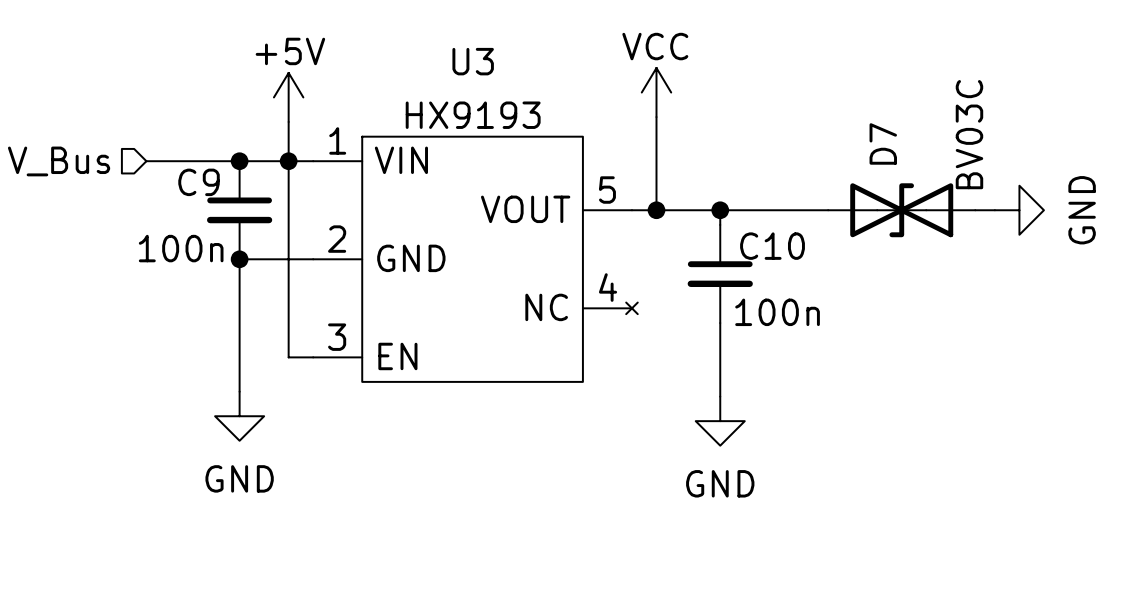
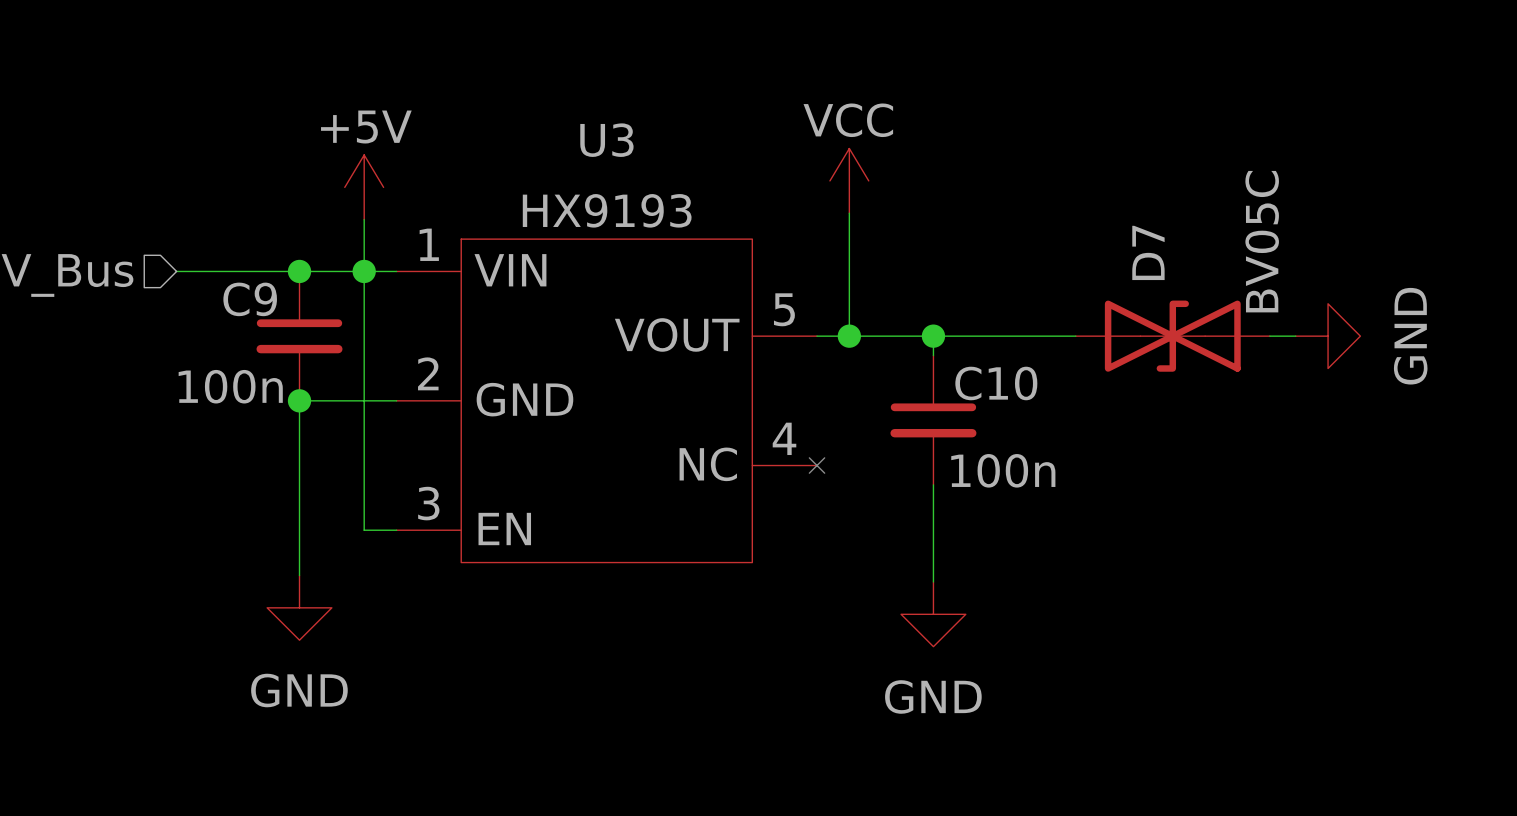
D7 value: BV03C (969, 134) -> BV05C (1262, 241)

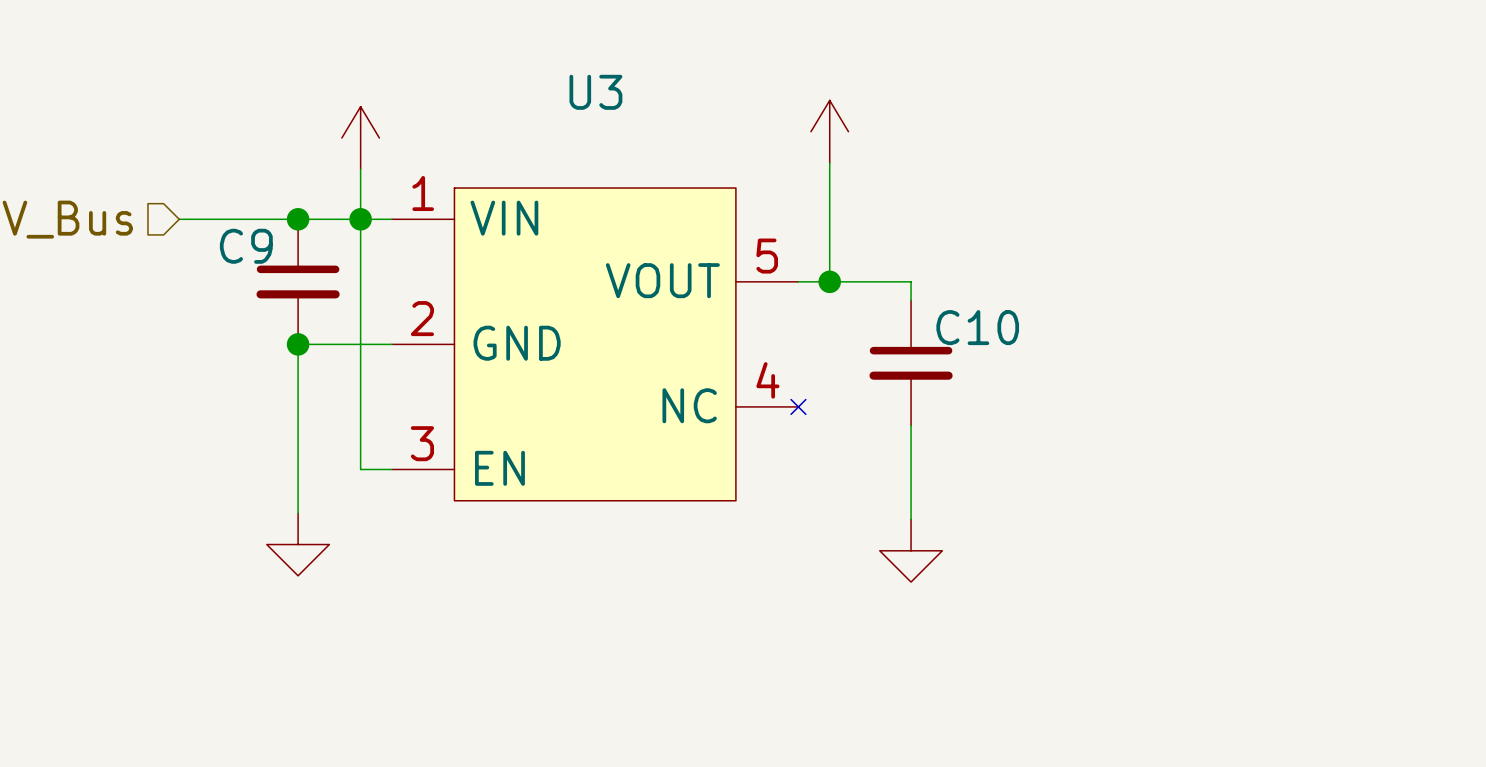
power symbol text: VCC (848, 120) -> none
power symbol text: +5V (366, 127) -> none
U3 value: HX9193 (607, 210) -> none
wire: (933, 336) (1075, 336) -> none
junction: (933, 336) -> none
D7: BV05C (1172, 336) -> none
wire: (1269, 336) (1295, 336) -> none
power symbol: GND (1328, 336) -> none
C9 value: 100n (230, 386) -> none
C10 value: 100n (1003, 470) -> none
power symbol text: GND (299, 690) -> none
power symbol text: GND (933, 696) -> none

